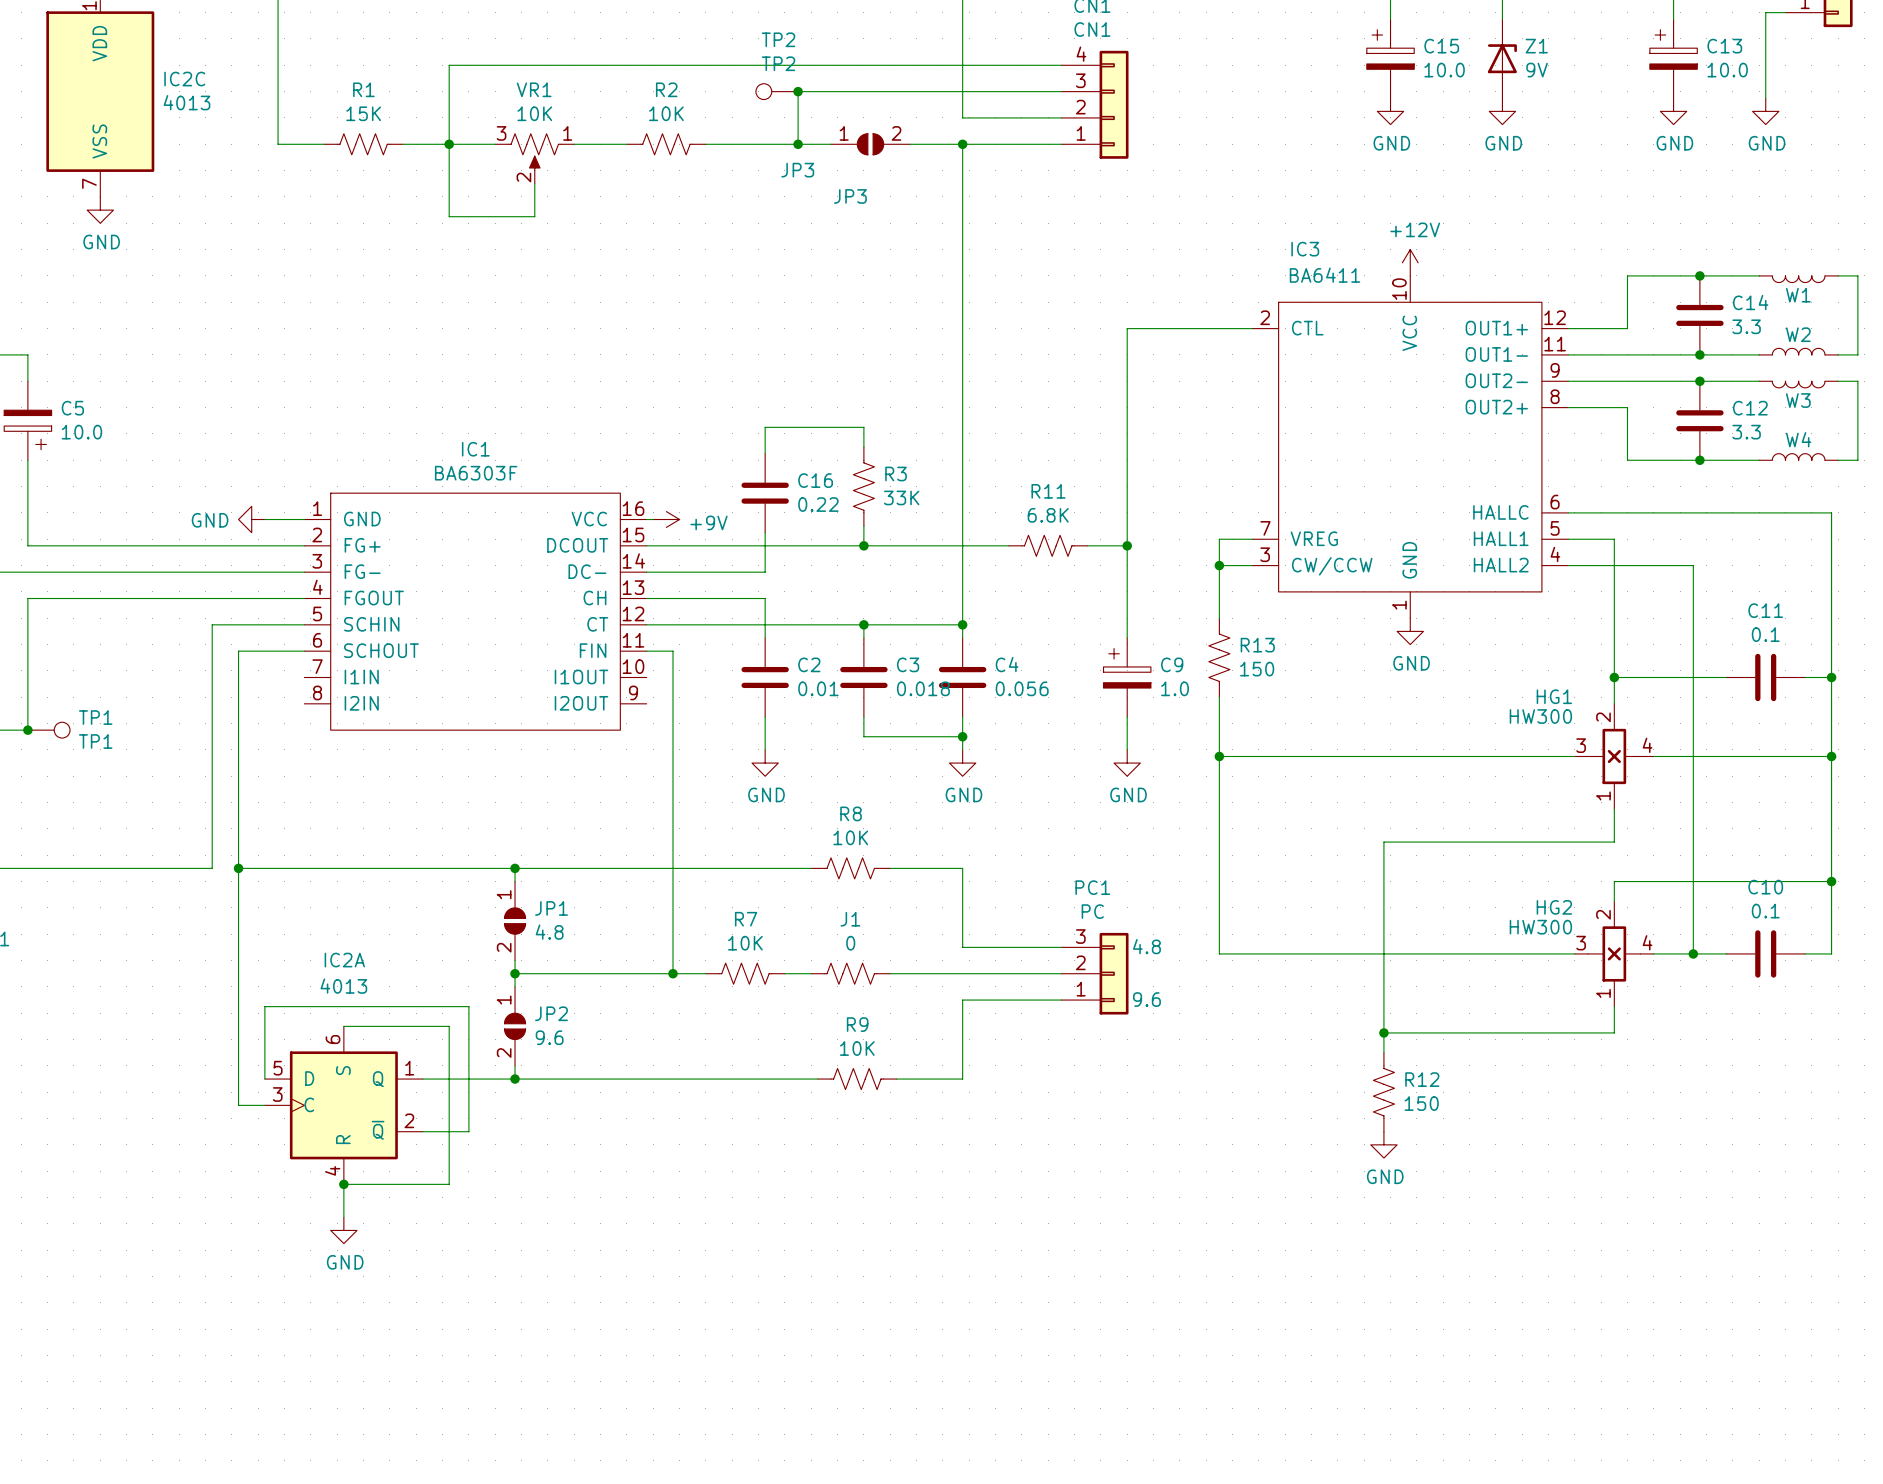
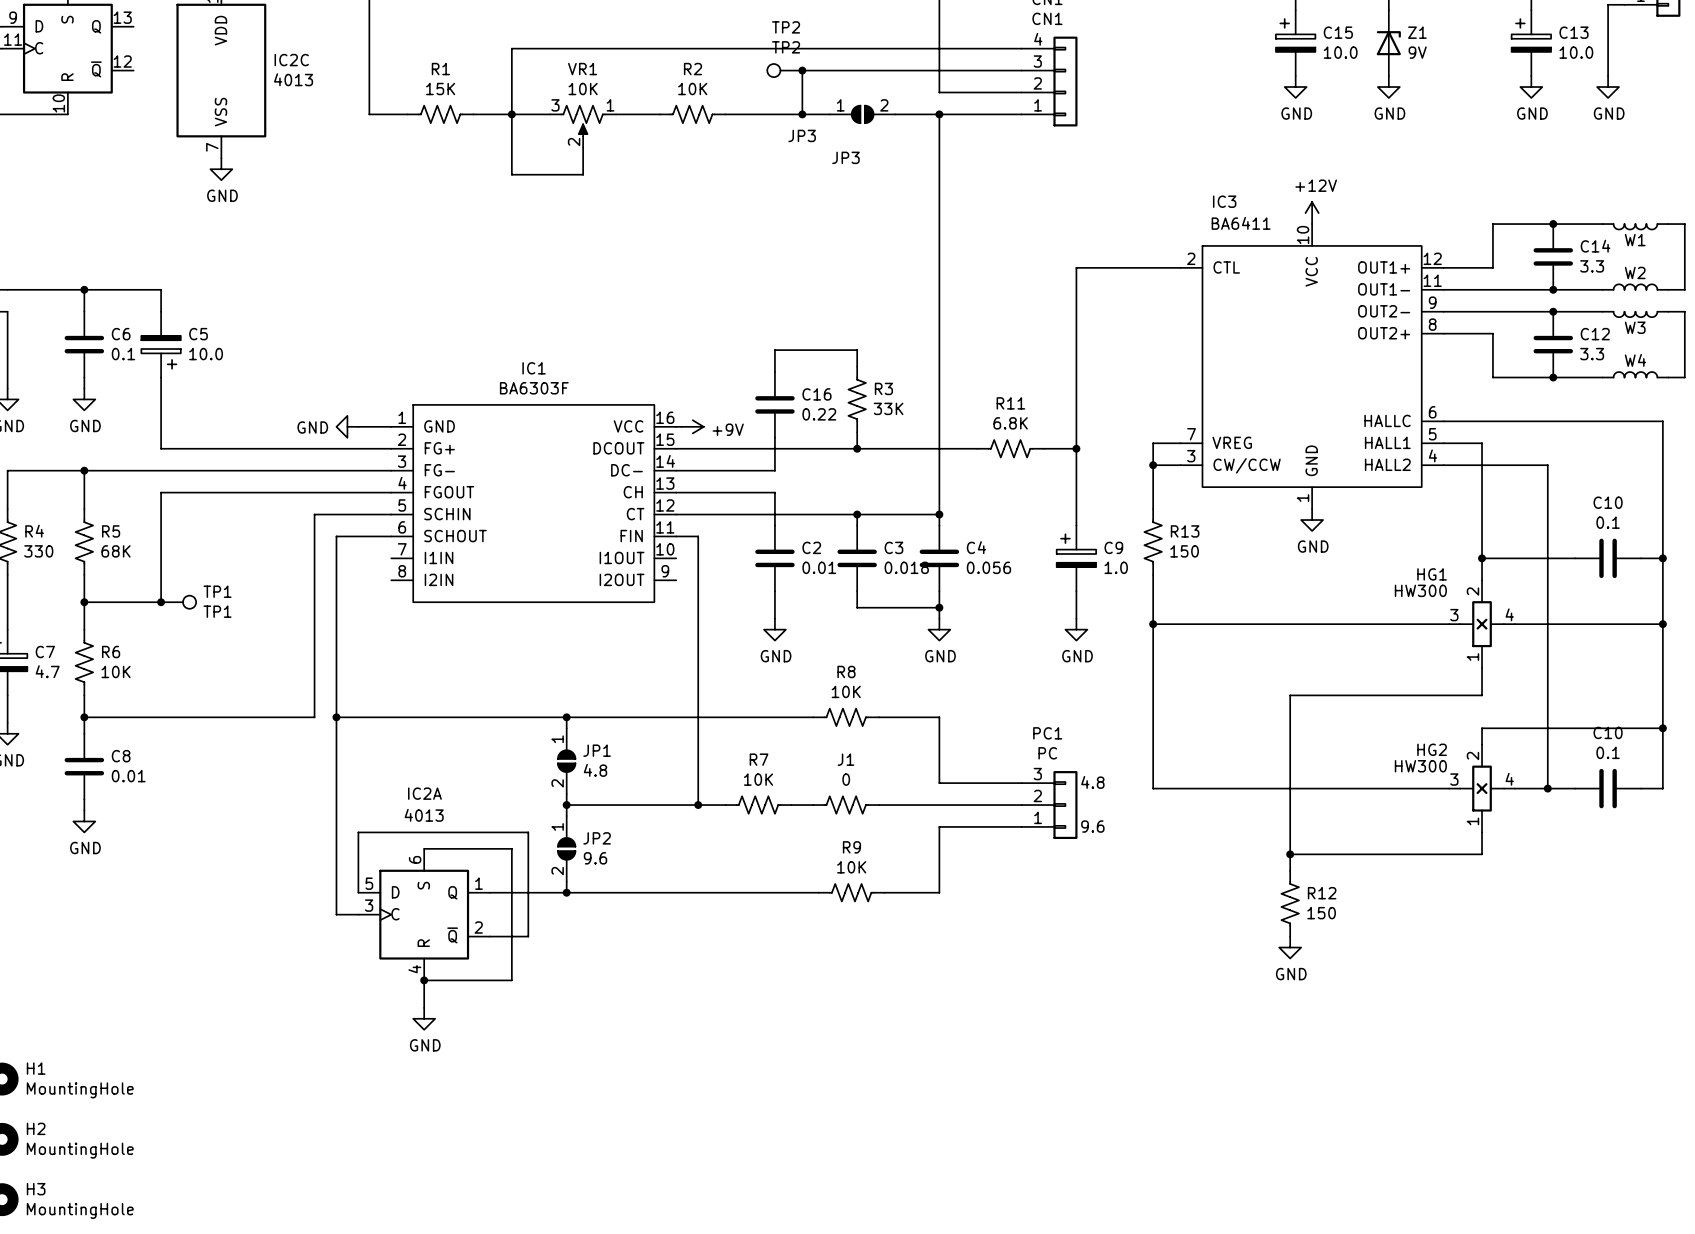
C11 name: C11 (1765, 610) -> C10 (1608, 502)

